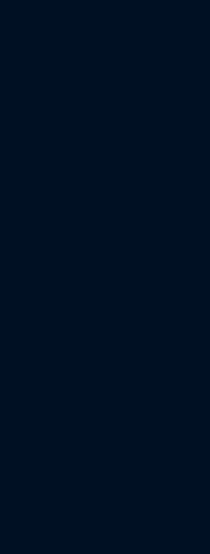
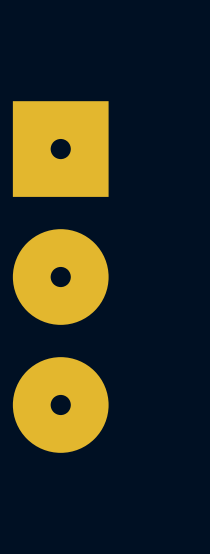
part: none -> (60, 277)

